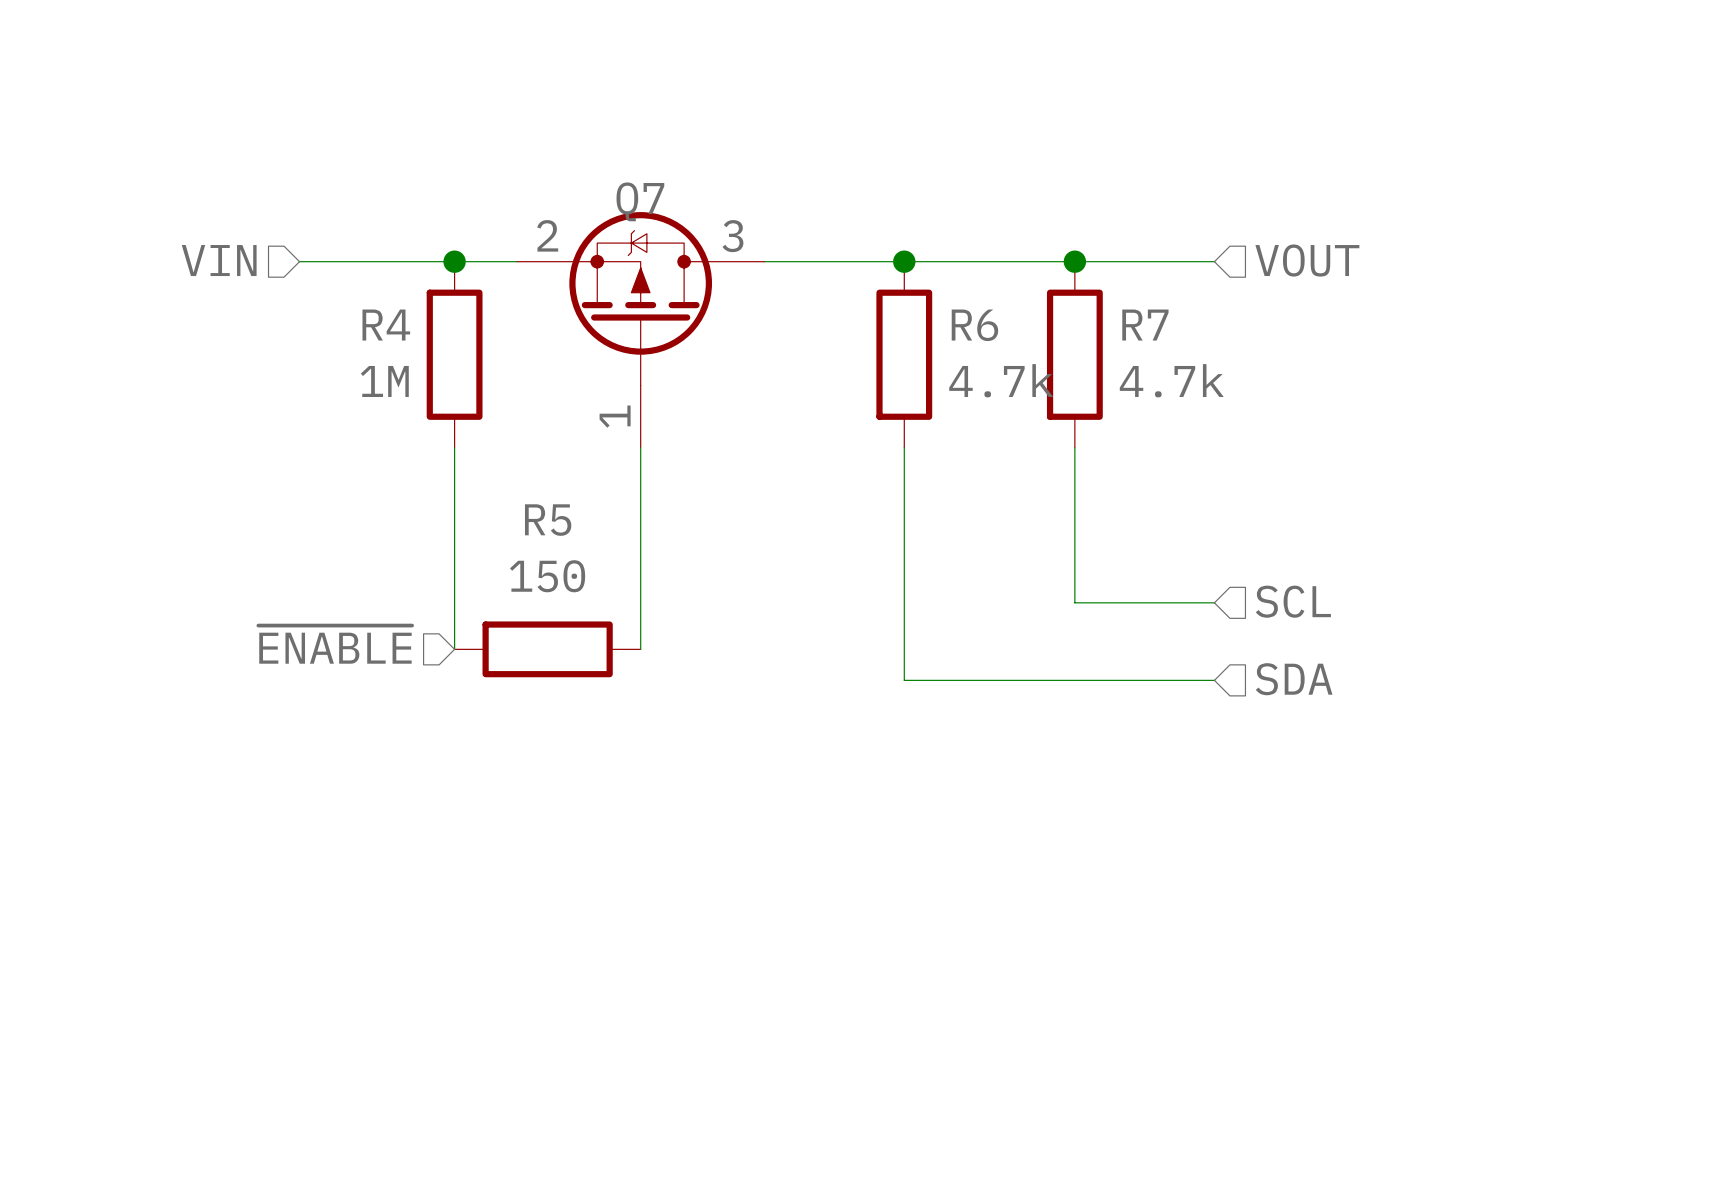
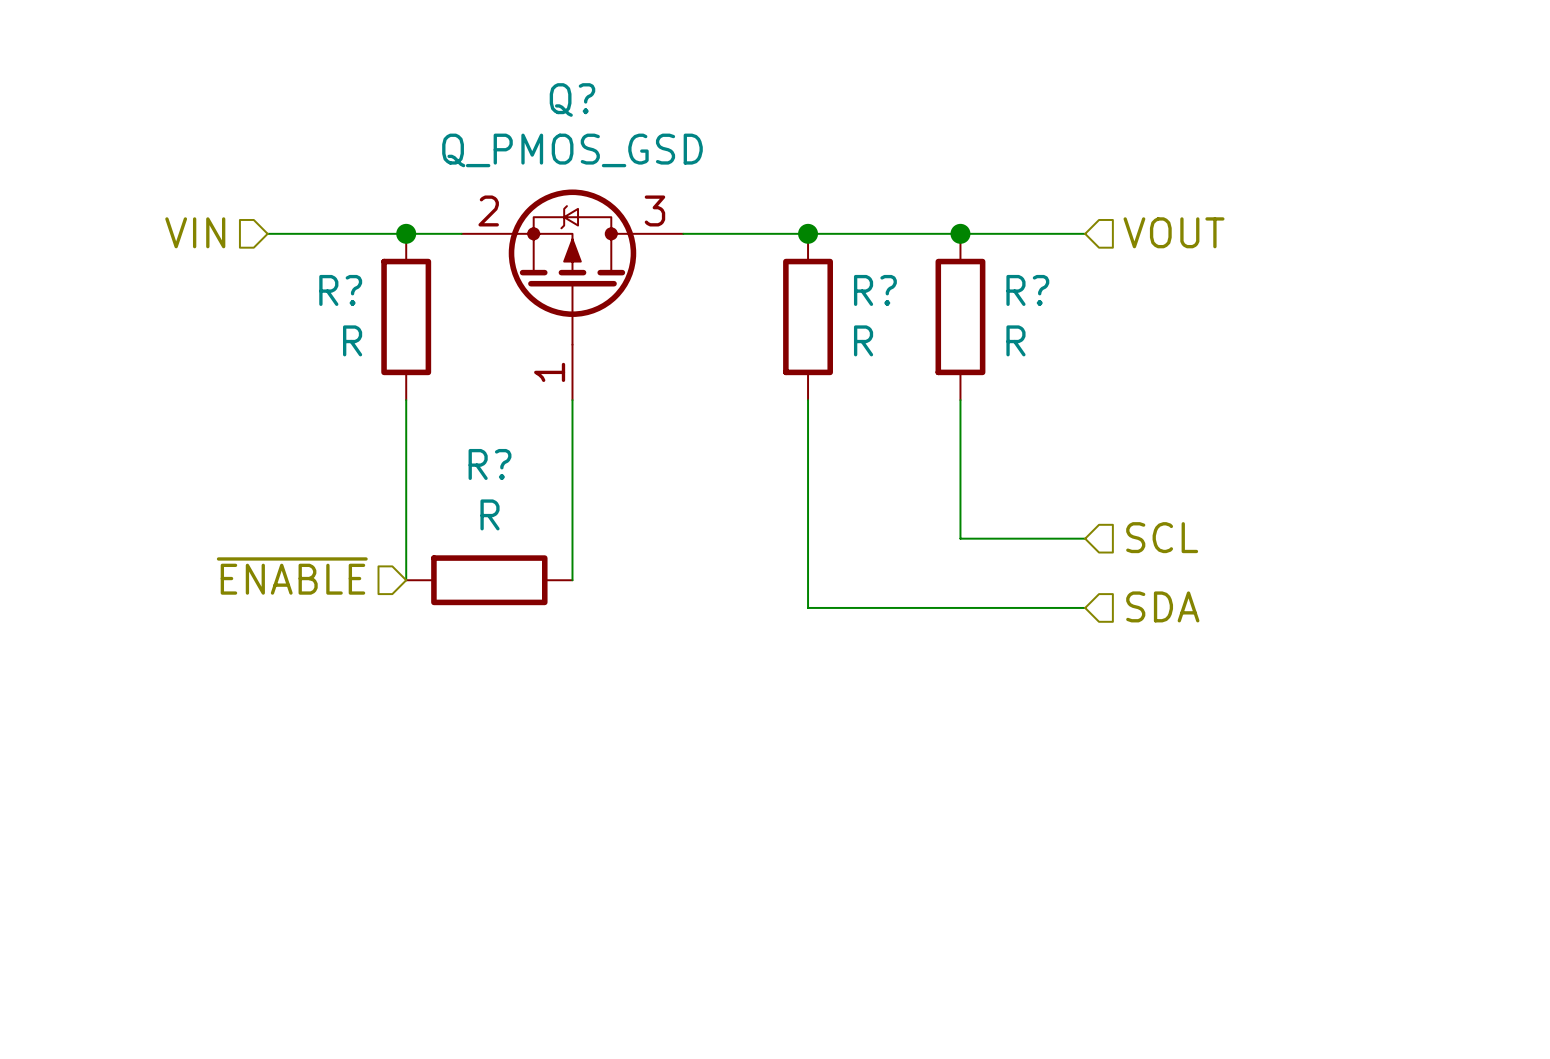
Q7 value: none -> Q_PMOS_GSD (572, 150)
Q7 name: Q7 (640, 201) -> Q? (572, 99)
R4 name: R4 (386, 325) -> R? (340, 290)
R6 name: R6 (974, 325) -> R? (875, 290)
R7 name: R7 (1145, 325) -> R? (1027, 290)
R6 value: 4.7k (1001, 380) -> R (863, 340)
R7 value: 4.7k (1171, 380) -> R (1015, 340)
R4 value: 1M (384, 381) -> R (352, 340)
R5 name: R5 (548, 520) -> R? (490, 464)
R5 value: 150 (547, 576) -> R (490, 514)

